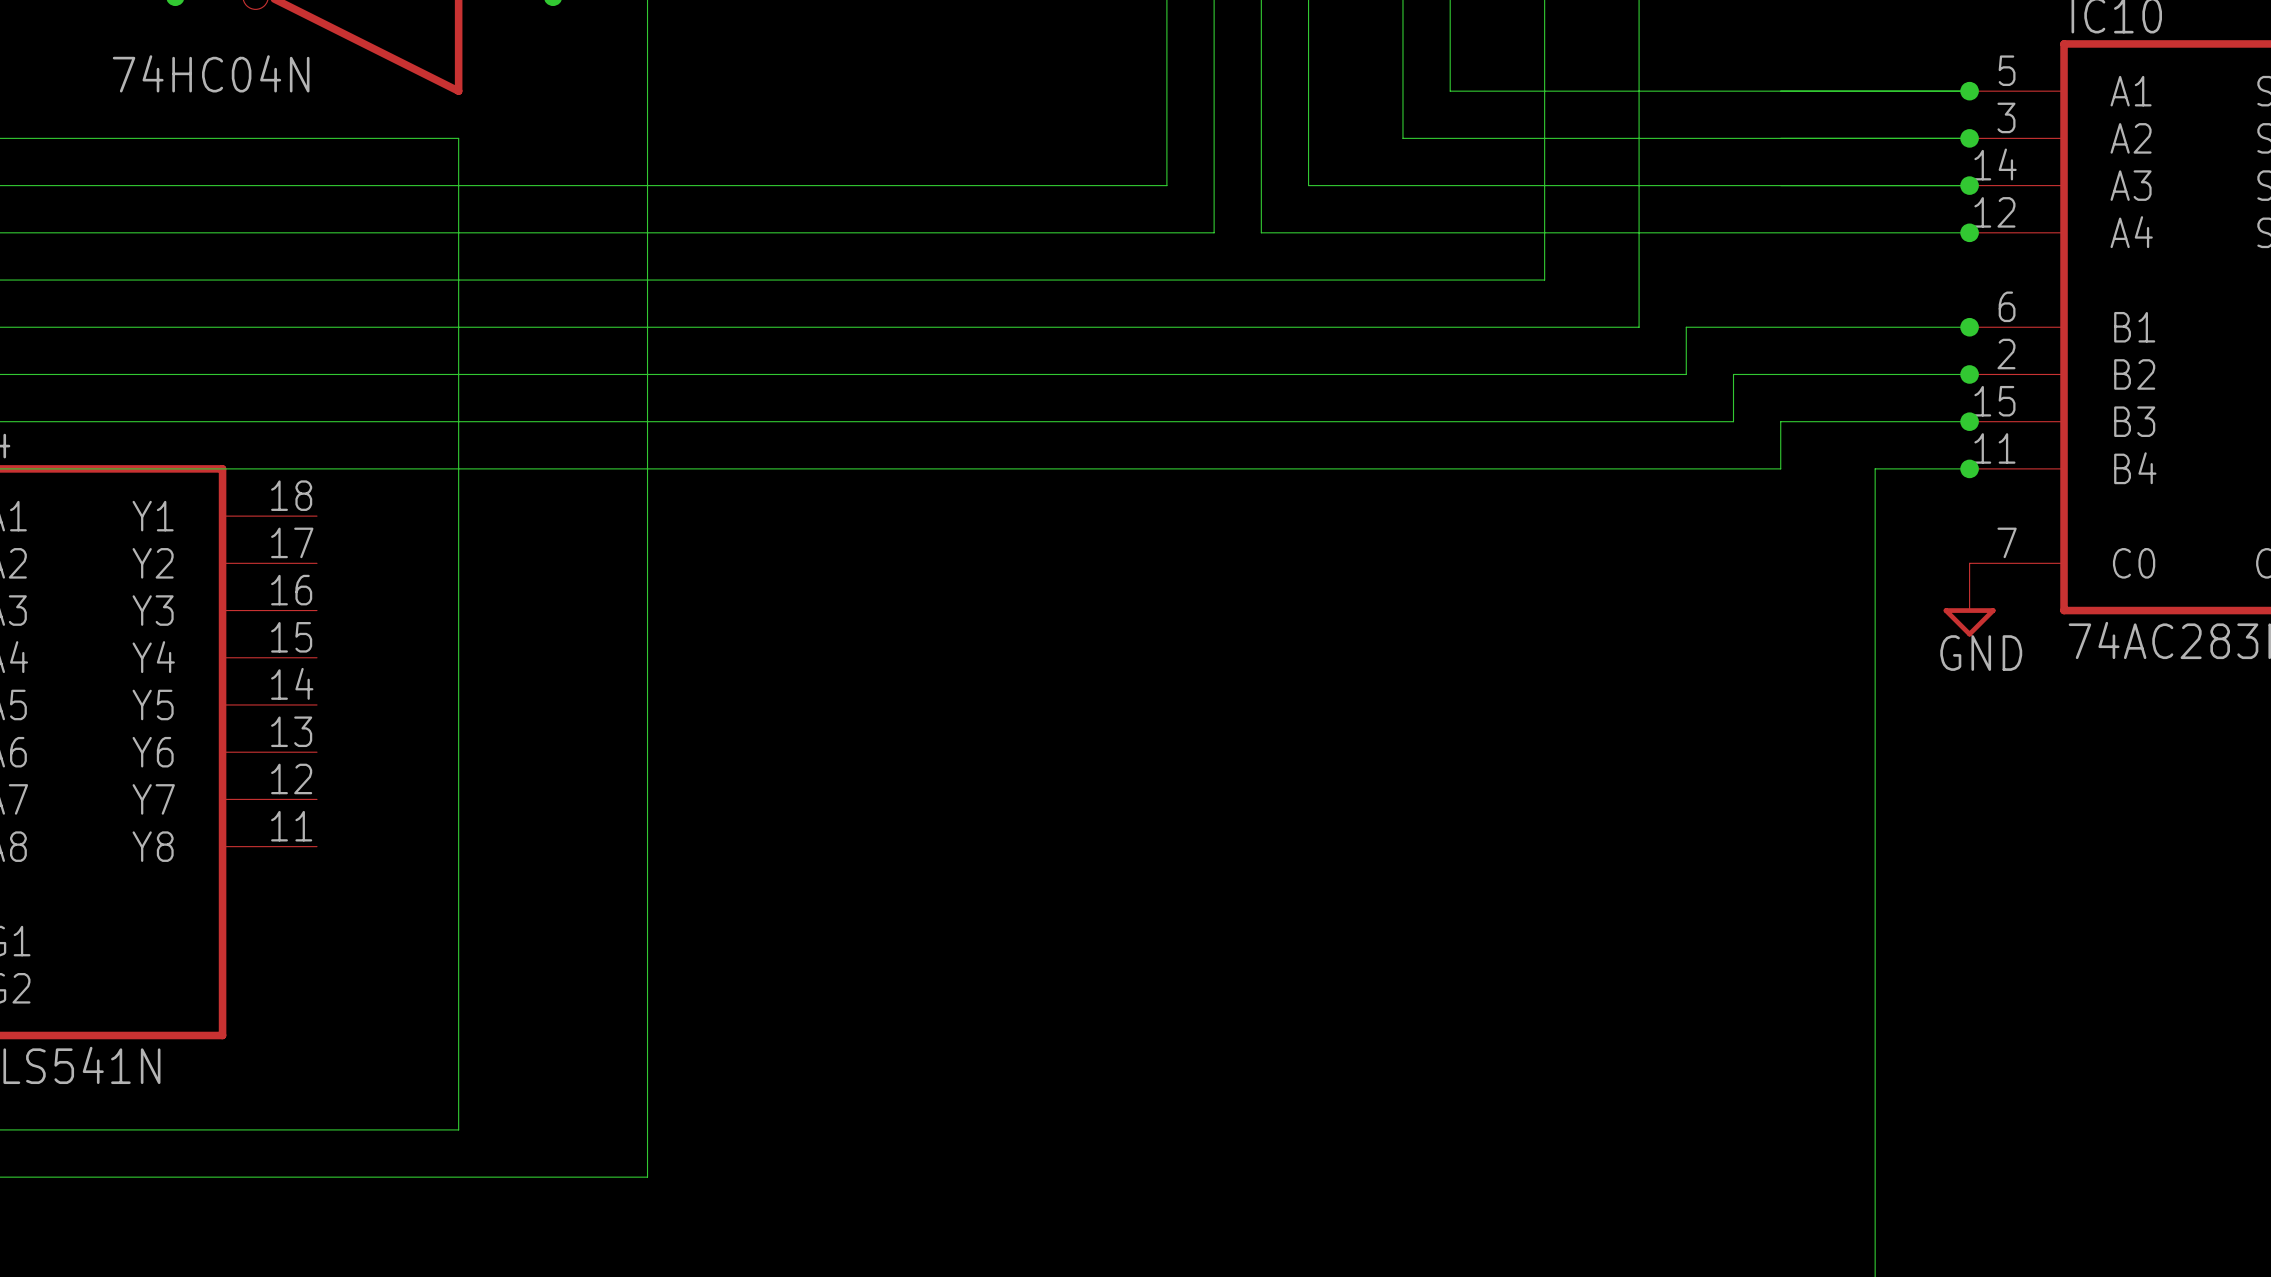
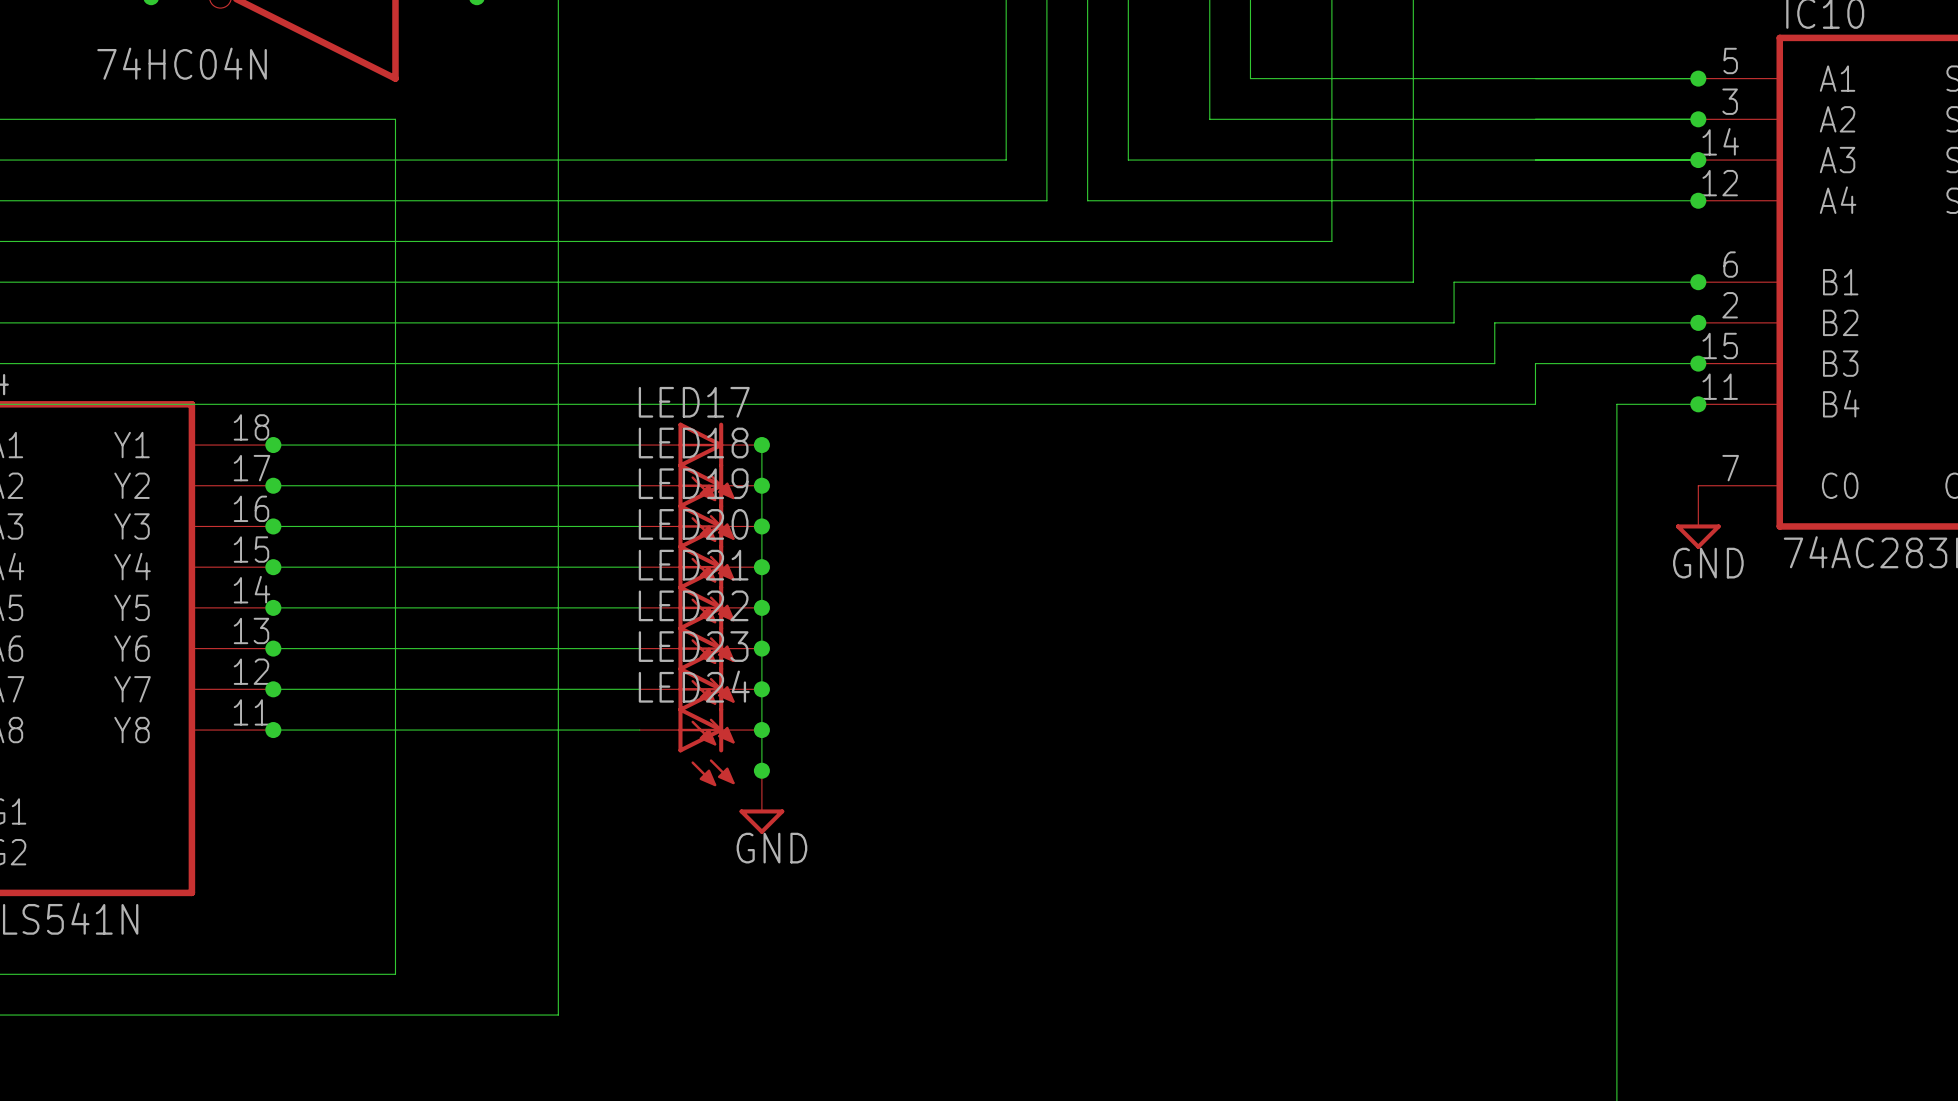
wire: none -> (273, 445) (639, 445)
junction: none -> (273, 445)
wire: none -> (761, 445) (761, 770)
junction: none -> (761, 445)
LED17: none -> (700, 461)
wire: none -> (273, 485) (639, 485)
junction: none -> (273, 485)
junction: none -> (761, 485)
LED18: none -> (700, 502)
wire: none -> (273, 526) (639, 526)
junction: none -> (273, 526)
junction: none -> (761, 526)
LED19: none -> (700, 543)
wire: none -> (273, 567) (639, 567)
junction: none -> (273, 567)
junction: none -> (761, 567)
LED20: none -> (700, 584)
wire: none -> (273, 607) (639, 607)
junction: none -> (273, 607)
junction: none -> (761, 607)
LED21: none -> (700, 624)
wire: none -> (273, 648) (639, 648)
junction: none -> (273, 648)
junction: none -> (761, 648)
LED22: none -> (700, 665)
wire: none -> (273, 689) (639, 689)
junction: none -> (273, 689)
junction: none -> (761, 689)
LED23: none -> (700, 706)
wire: none -> (273, 730) (639, 730)
junction: none -> (273, 730)
junction: none -> (761, 730)
LED24: none -> (700, 746)
junction: none -> (761, 770)
power symbol: none -> GND (761, 802)

